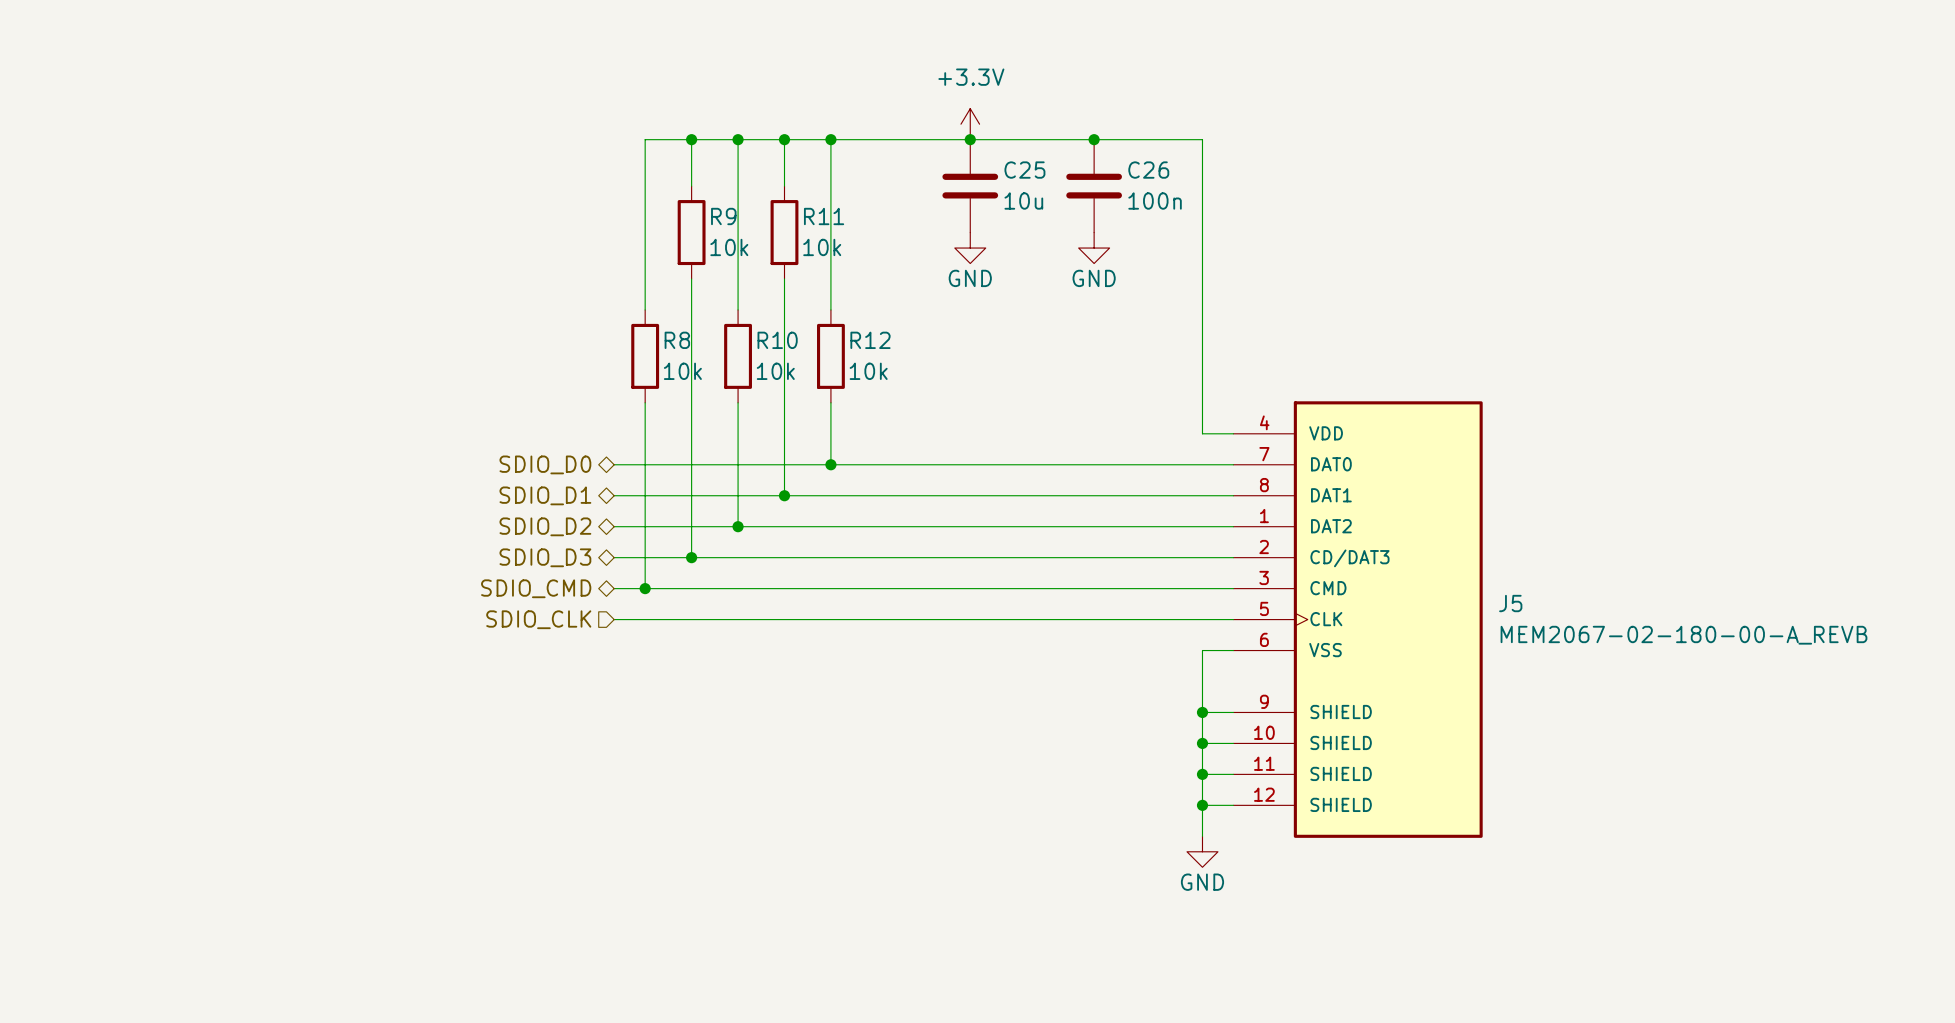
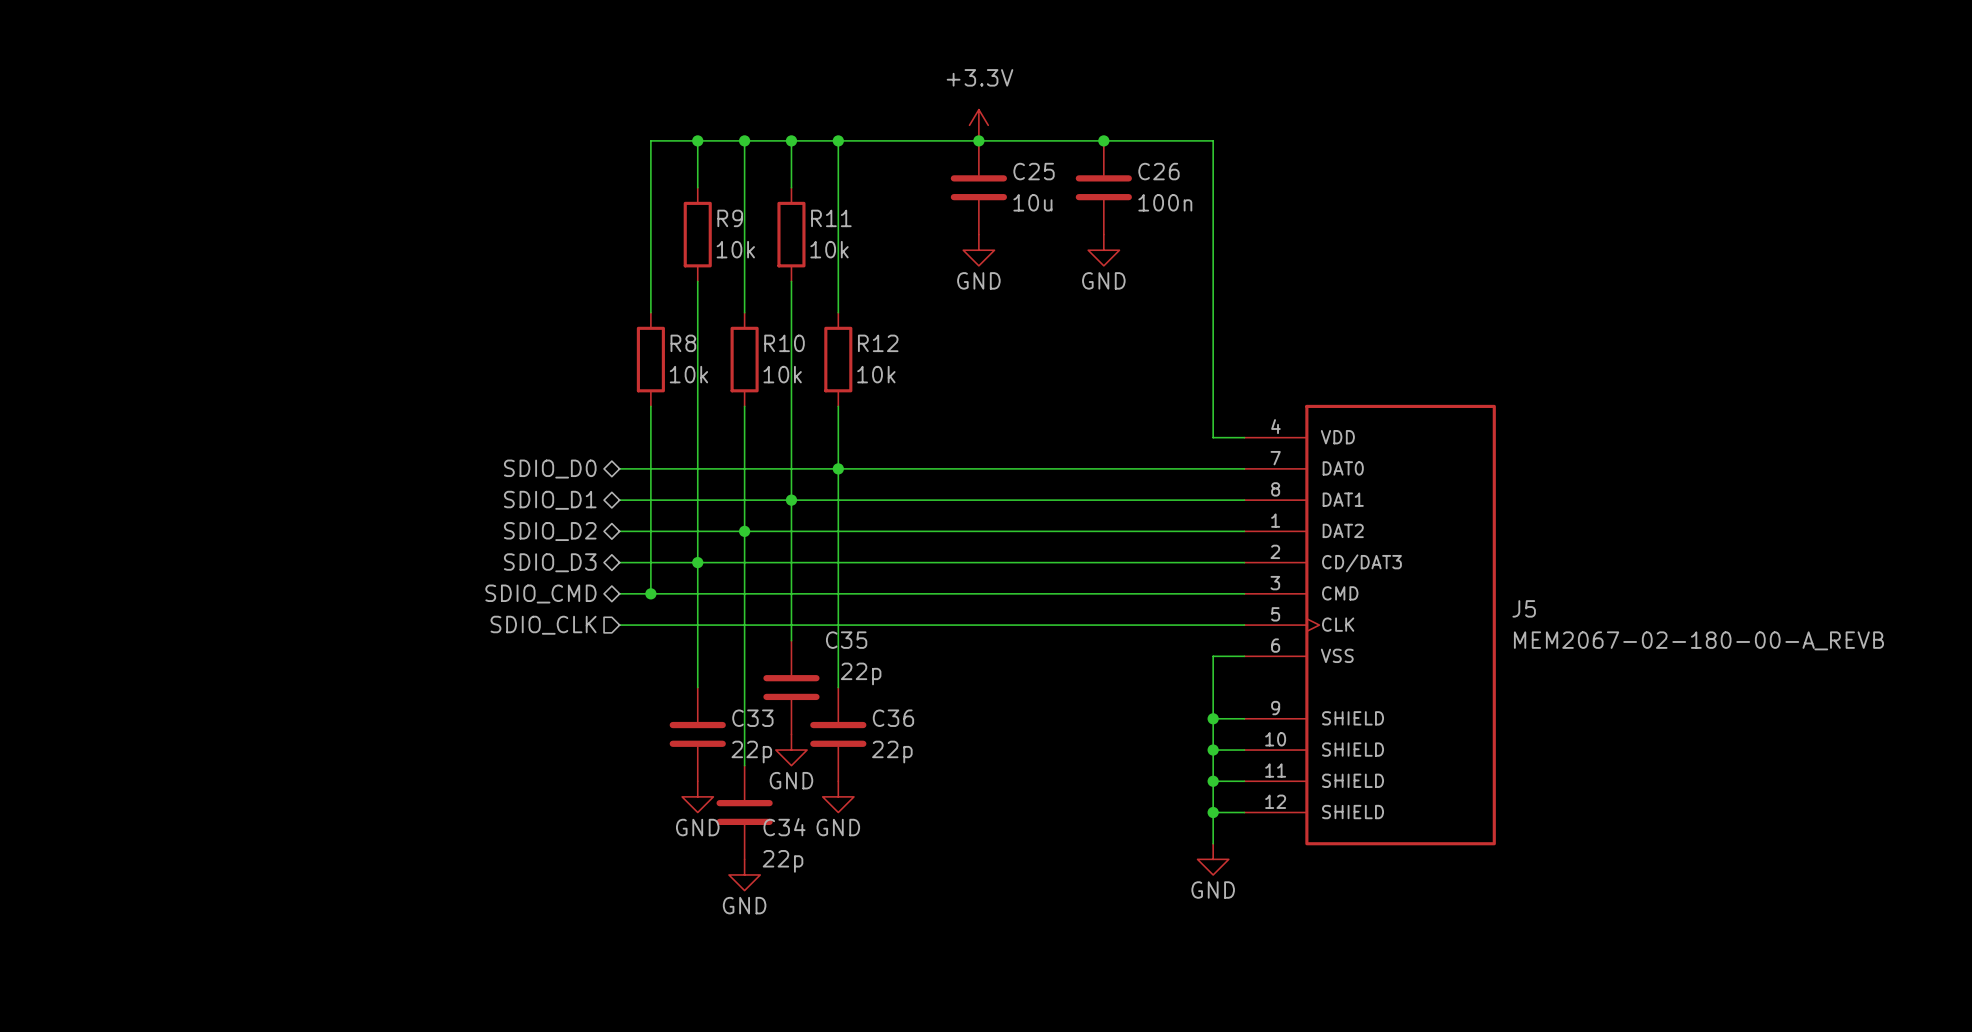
wire: none -> (838, 468) (838, 687)
wire: none -> (791, 500) (791, 640)
wire: none -> (744, 531) (744, 765)
wire: none -> (697, 562) (697, 687)
C35: none -> 22p (791, 687)
C33: none -> 22p (697, 734)
C36: none -> 22p (838, 734)
power symbol: none -> GND (791, 750)
power symbol: none -> GND (697, 796)
power symbol: none -> GND (838, 796)
C34: none -> 22p (744, 812)
power symbol: none -> GND (744, 874)

